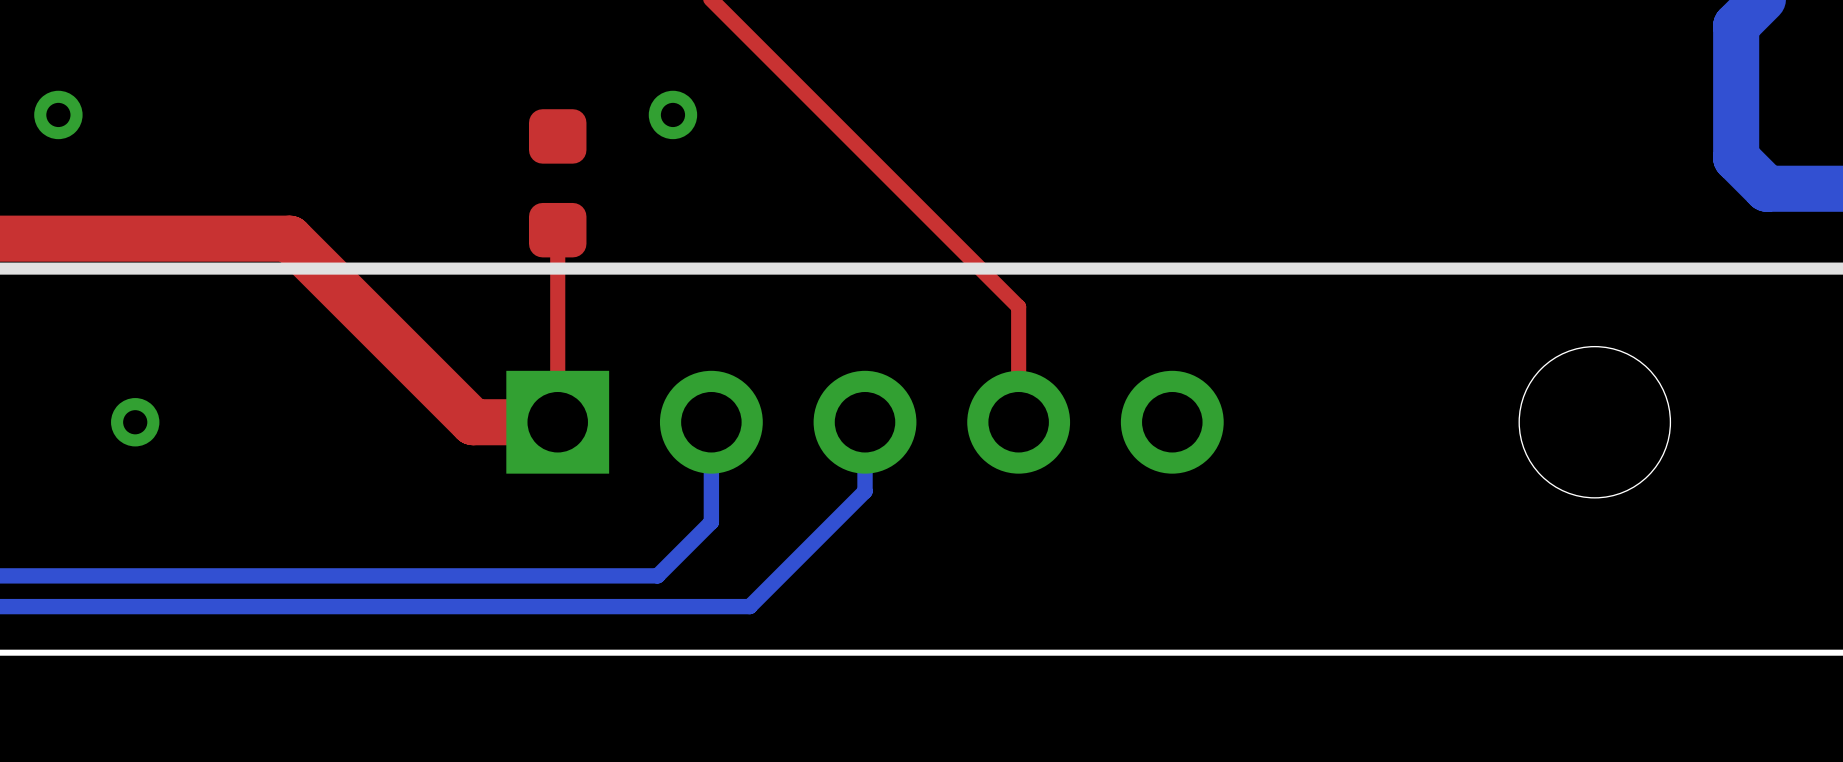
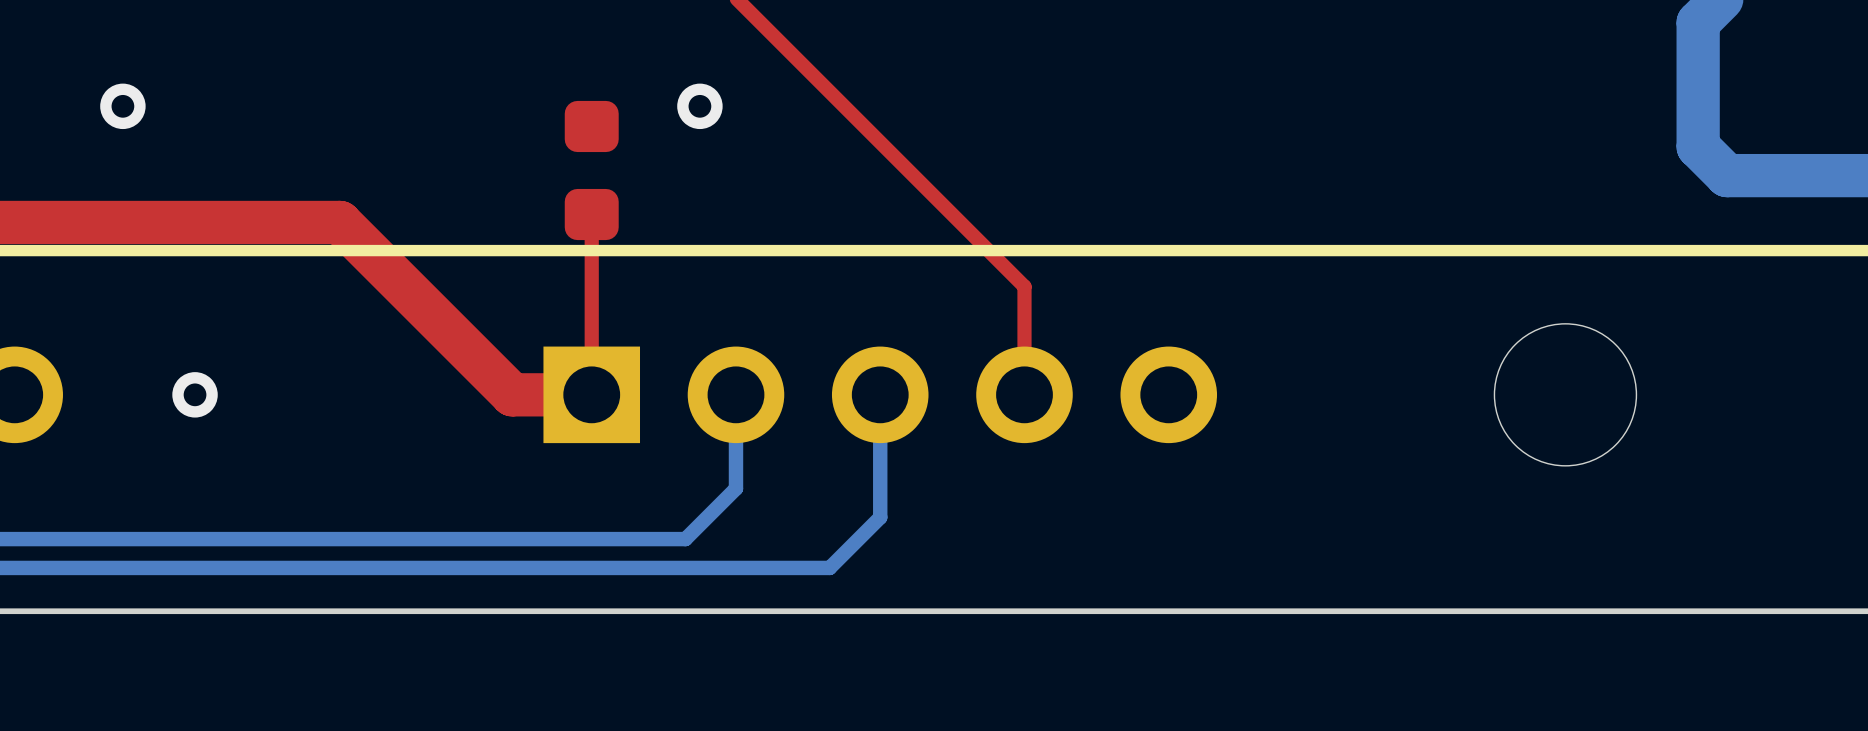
bottom track: (865, 491) (749, 606) -> (880, 459) (880, 517) (829, 567) (772, 567)

